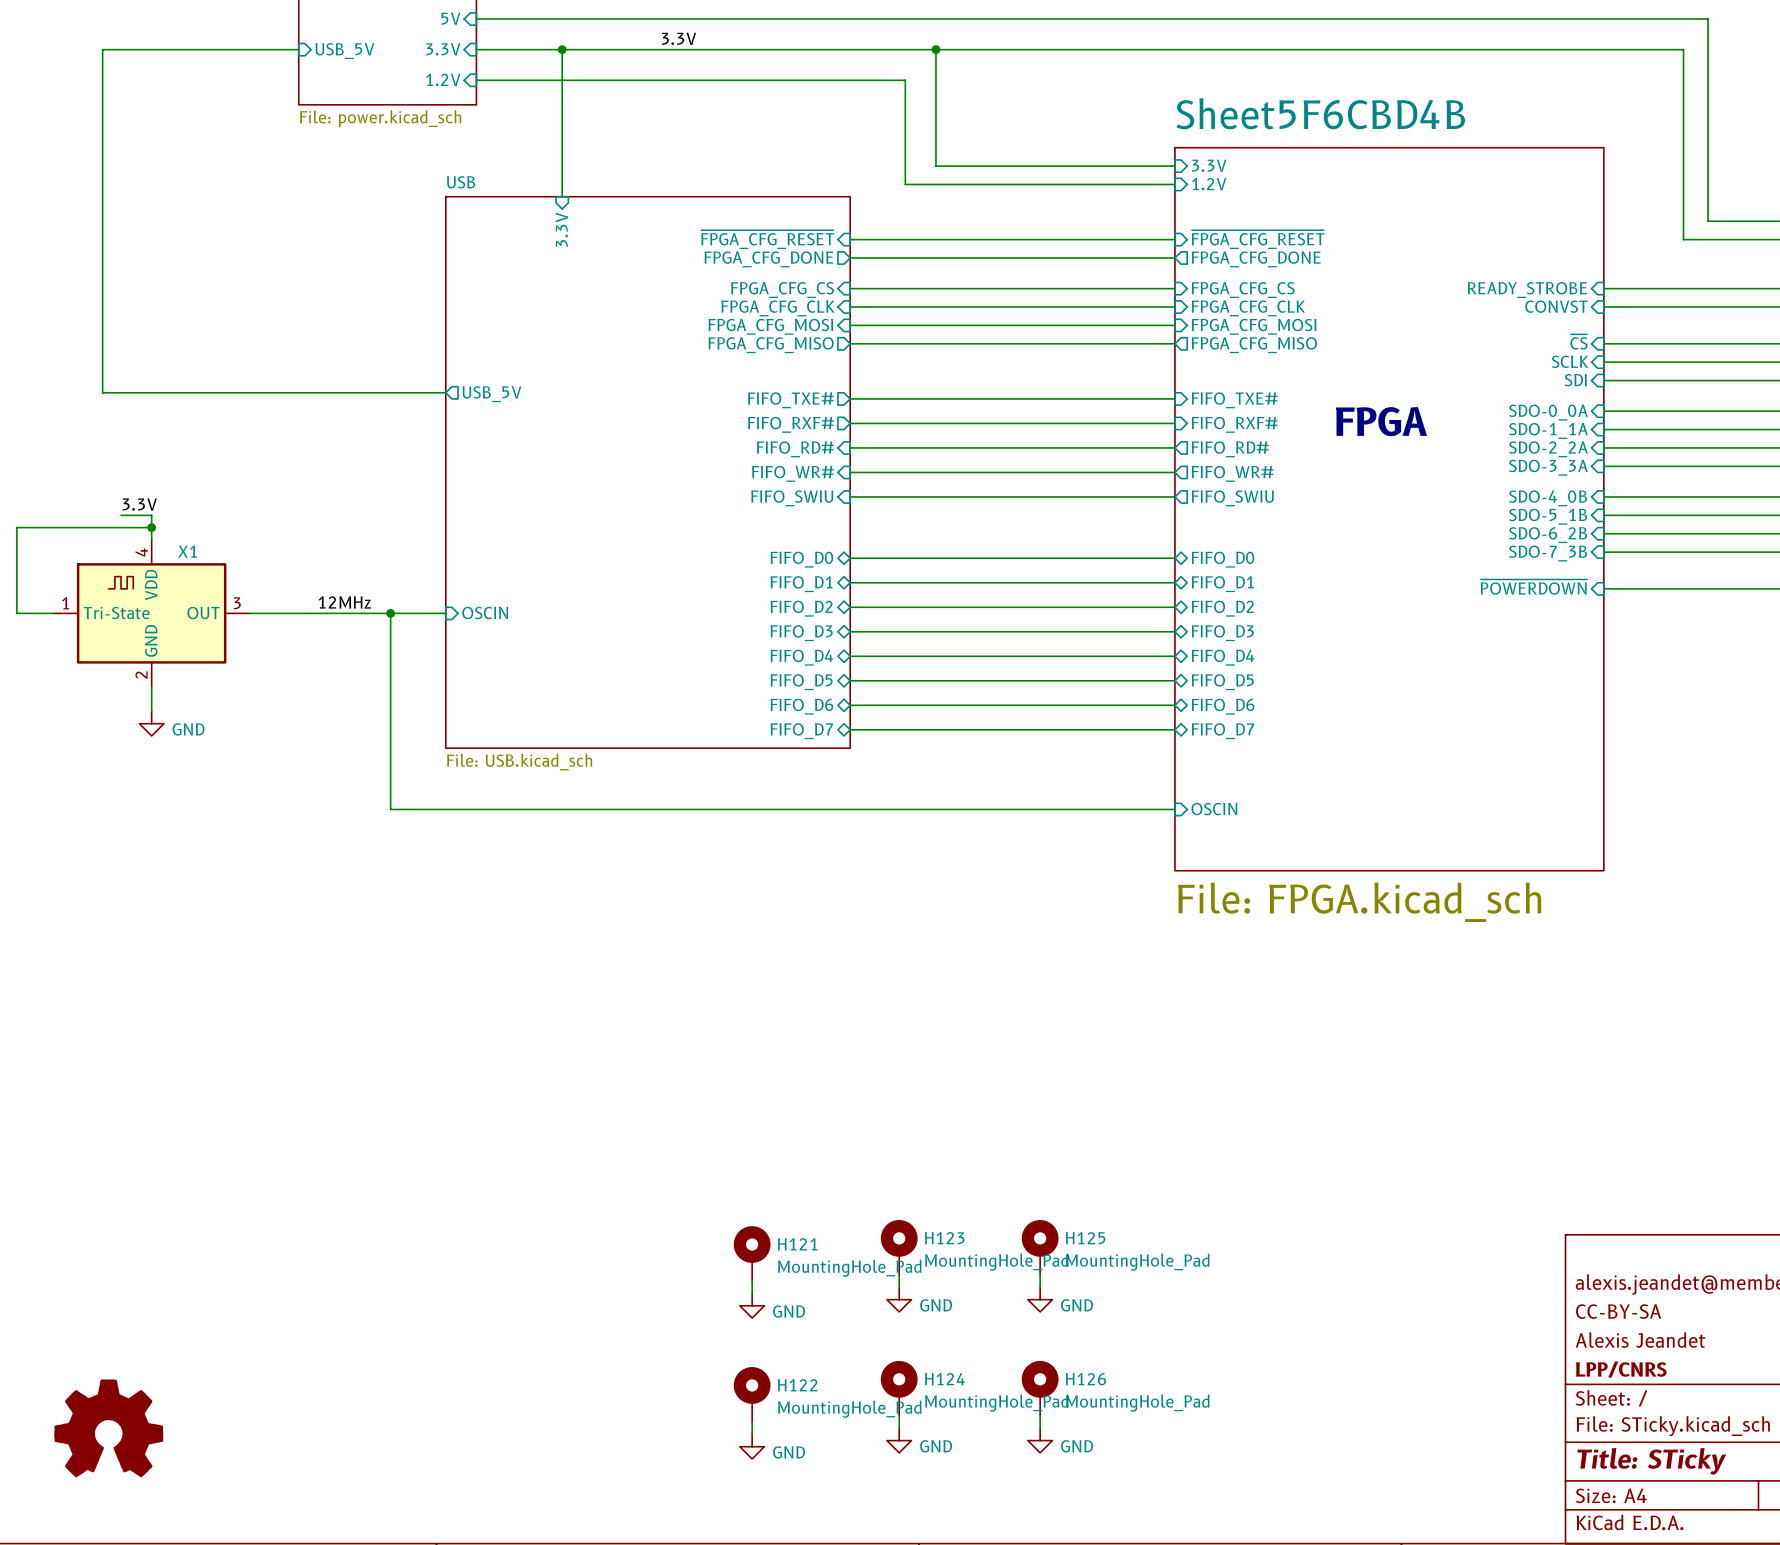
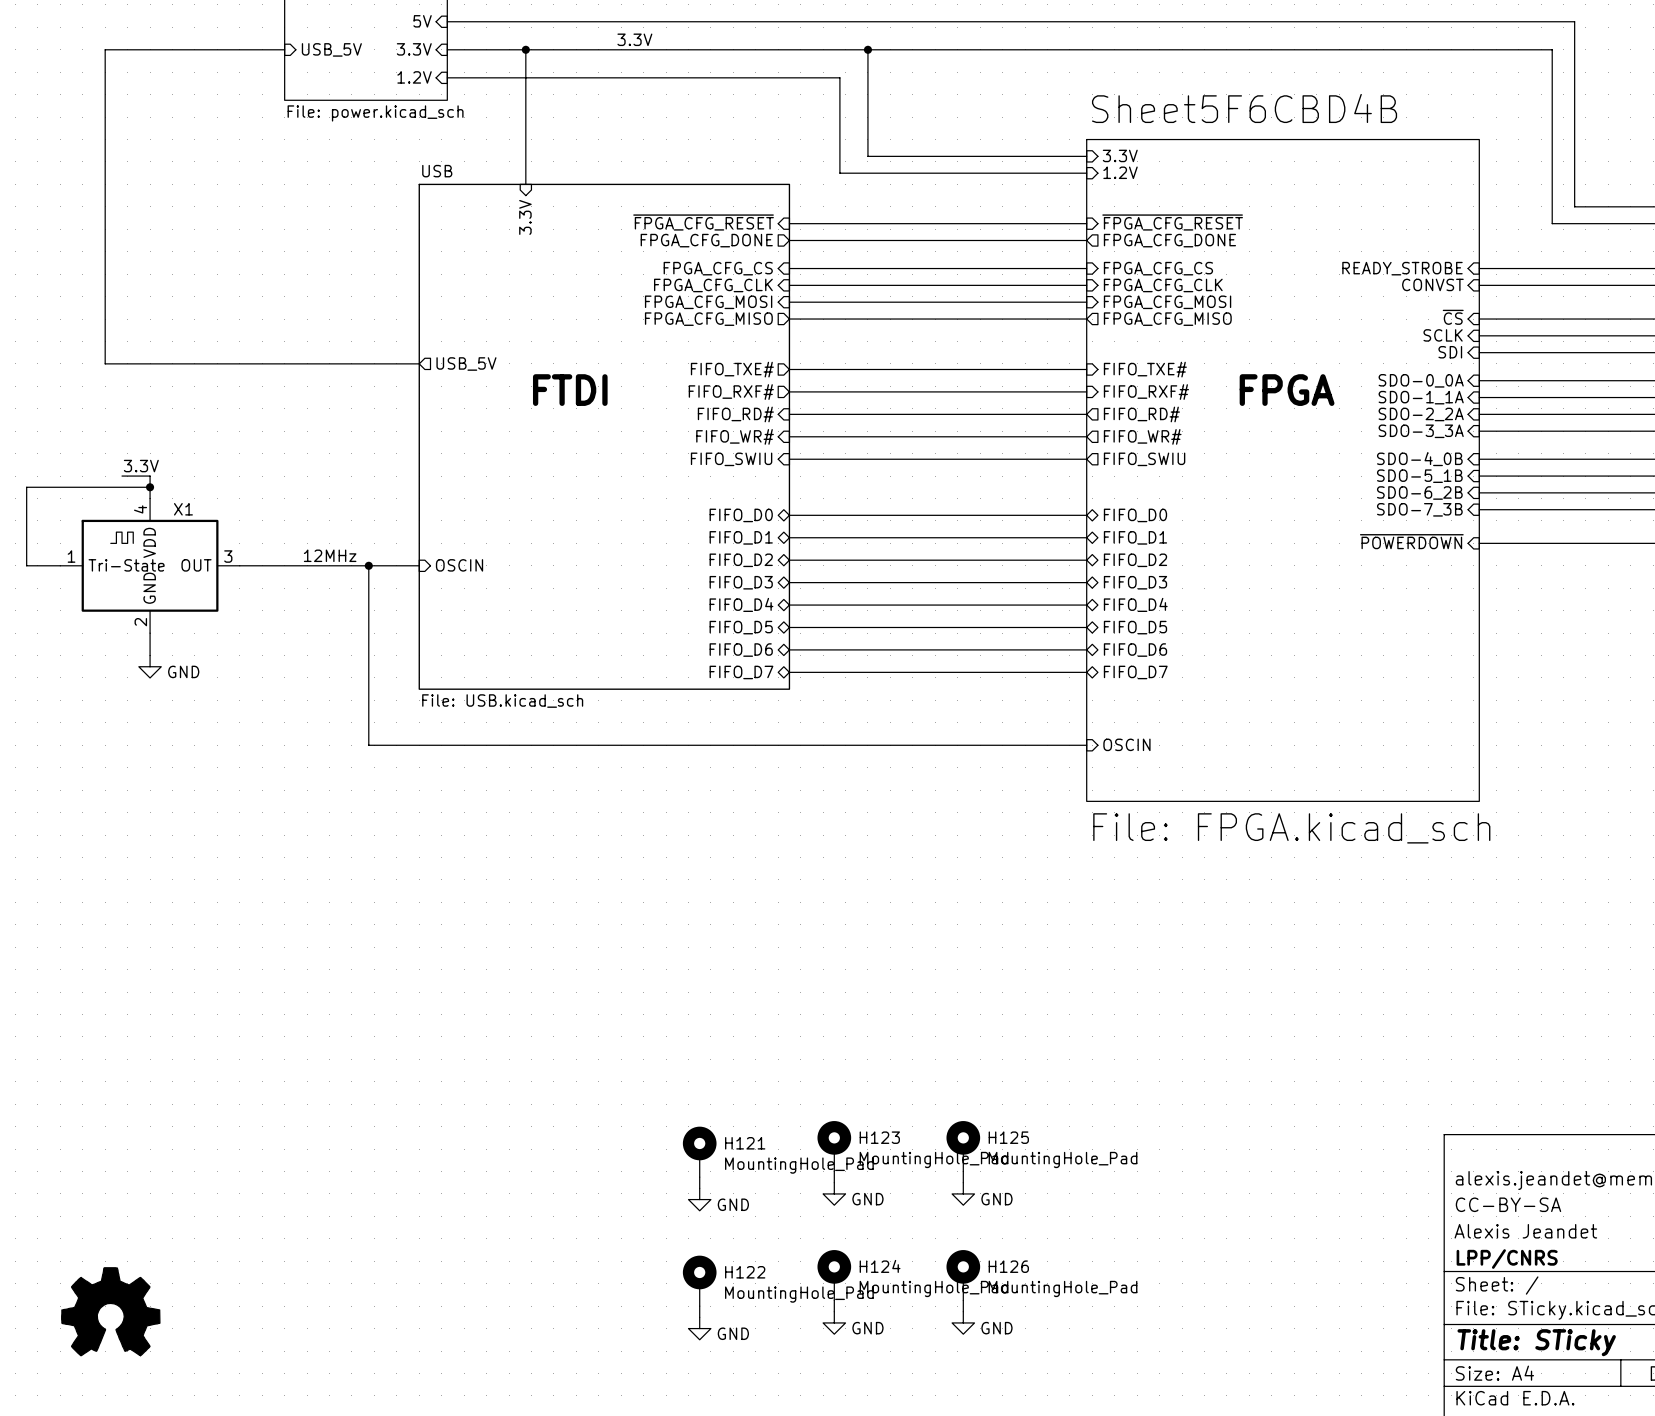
text: none -> FTDI (570, 390)

